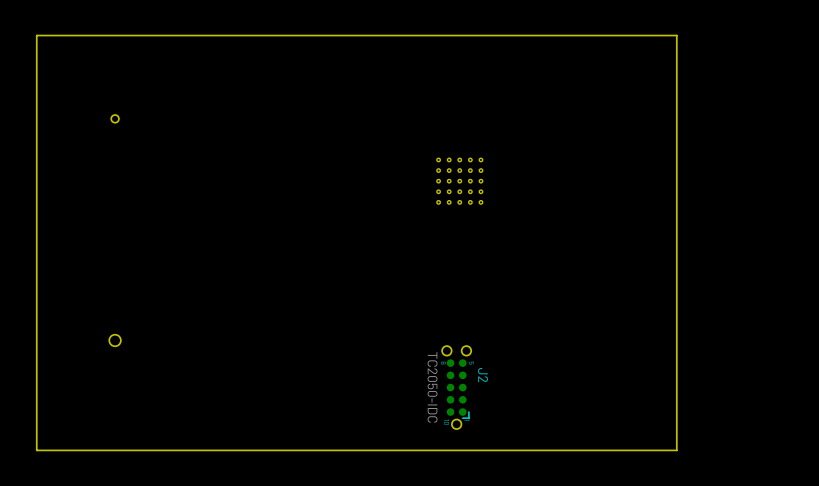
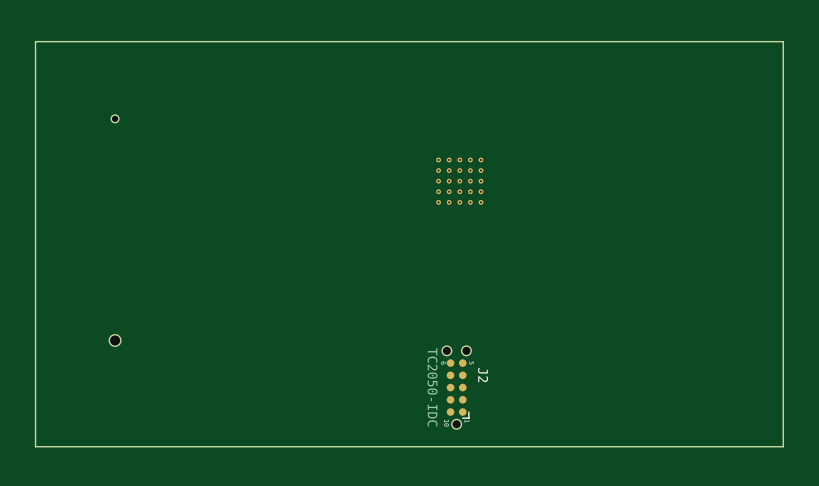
board edge: (676, 35) (36, 35) (36, 450) (676, 450) (676, 35) -> (783, 41) (783, 446) (35, 446) (35, 41) (783, 41)

